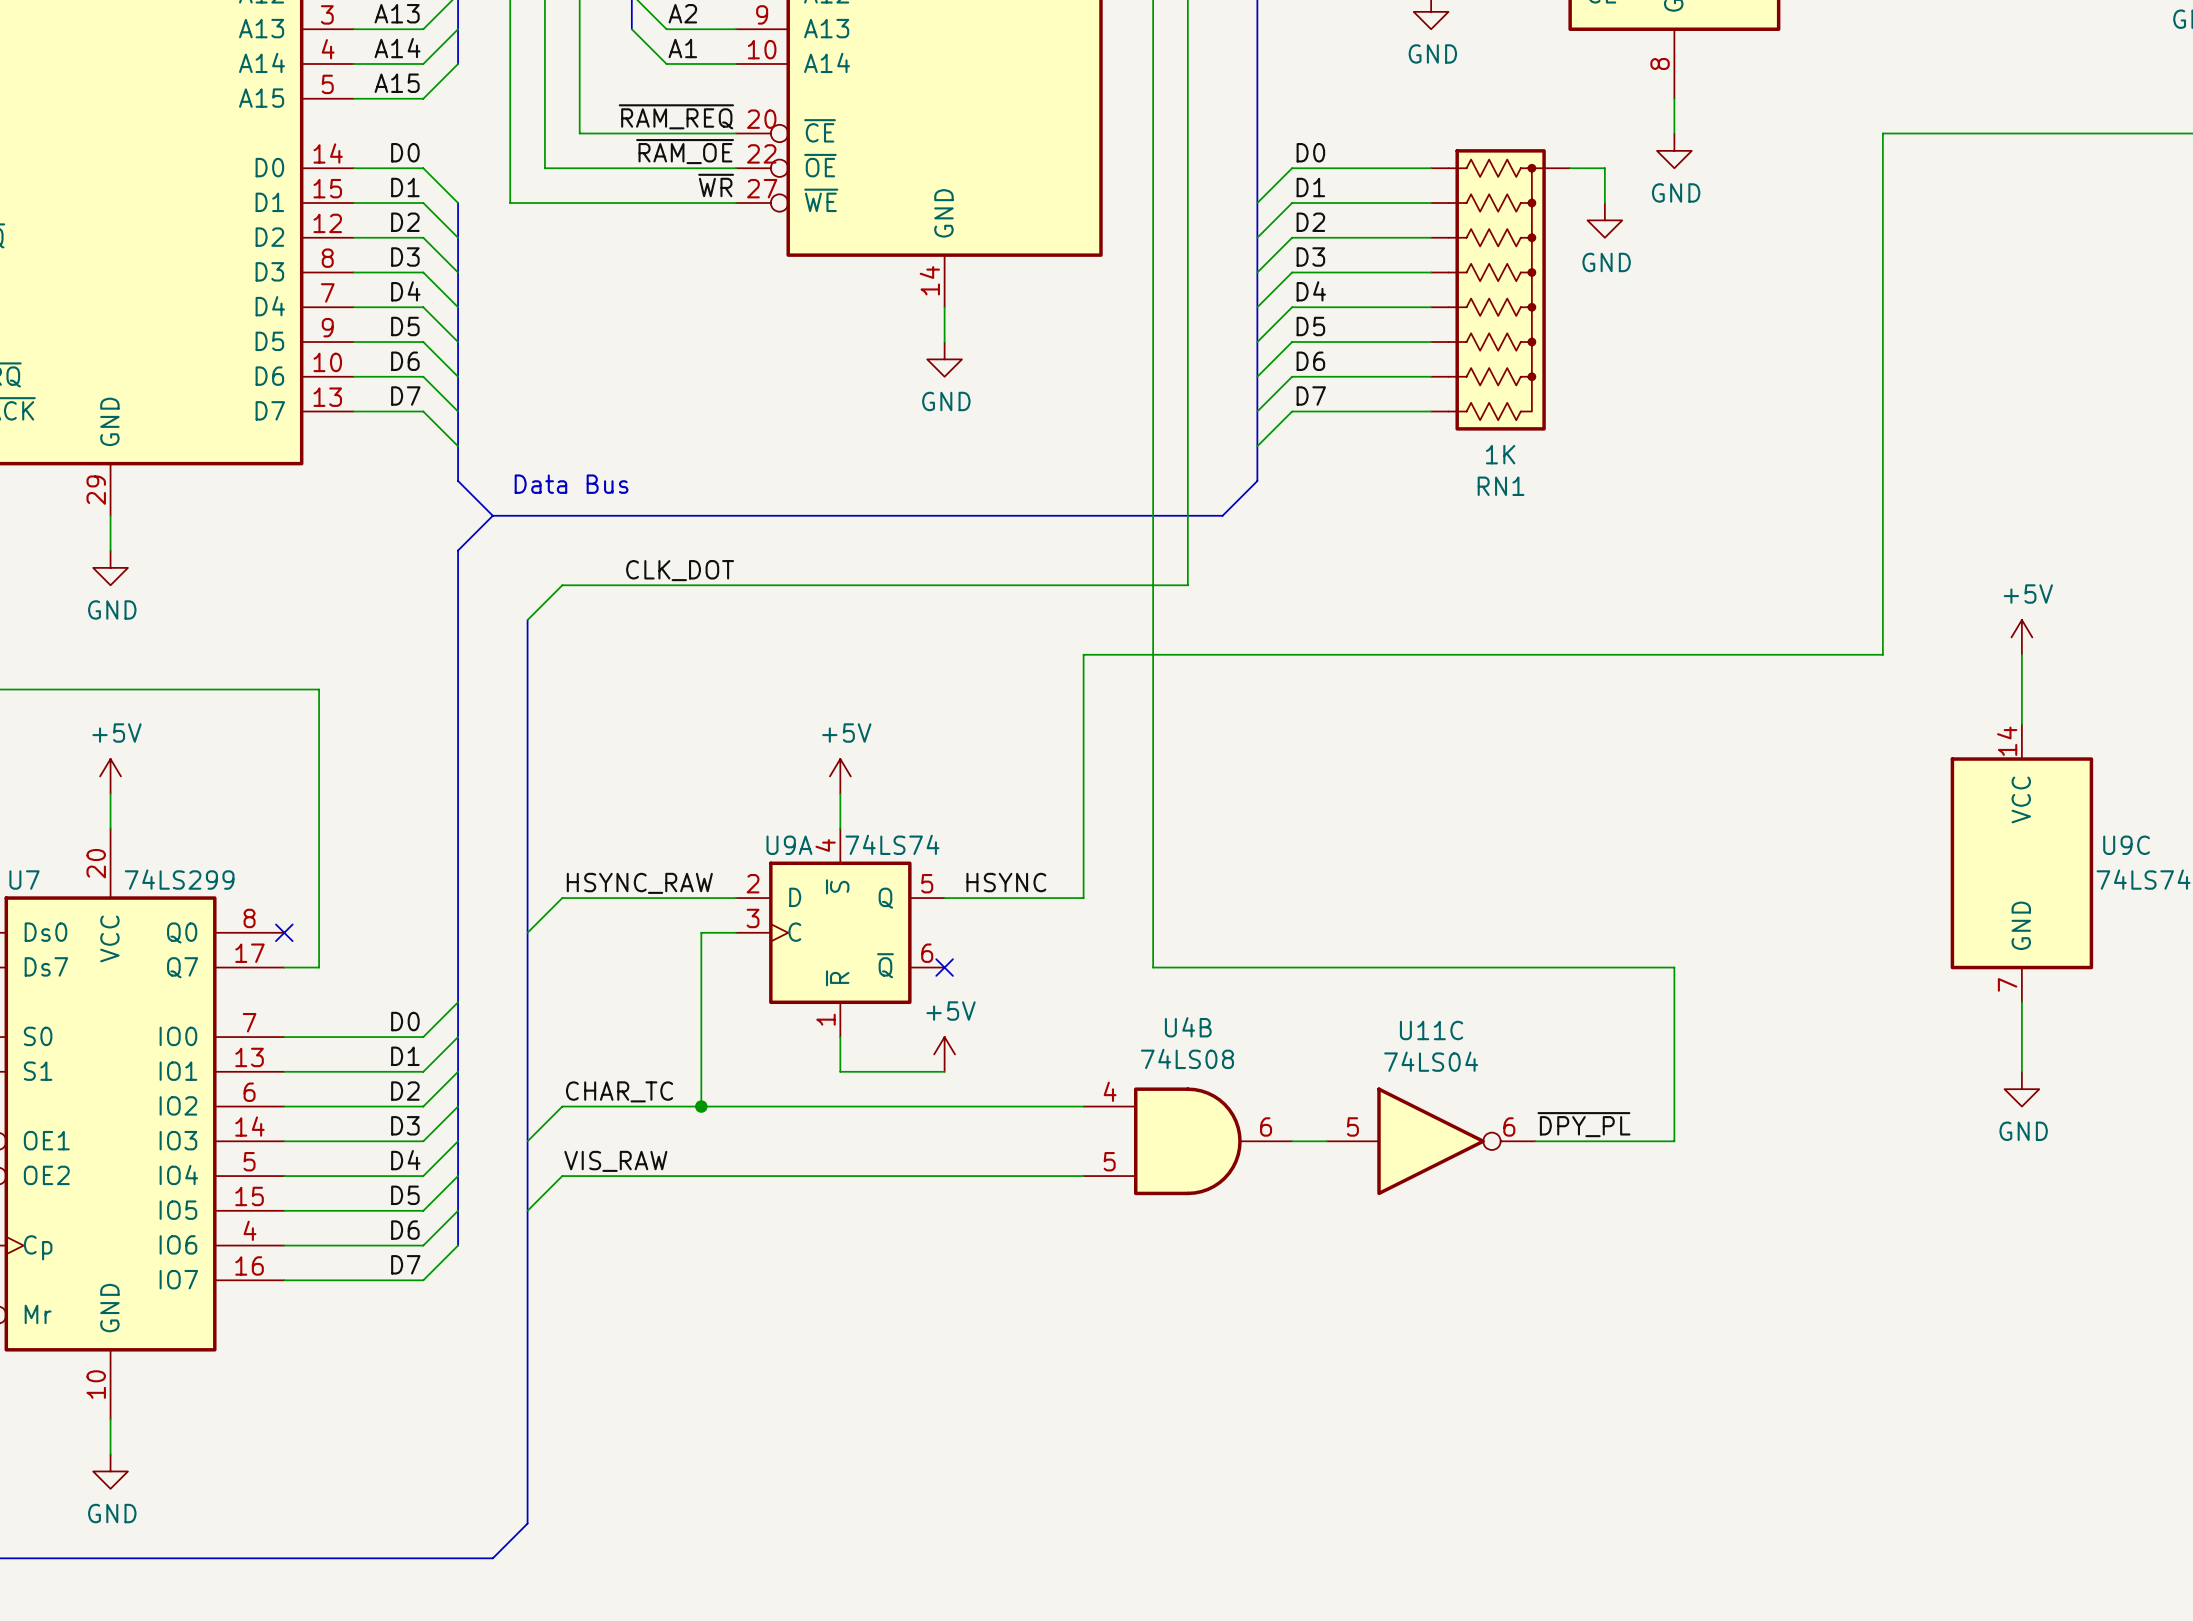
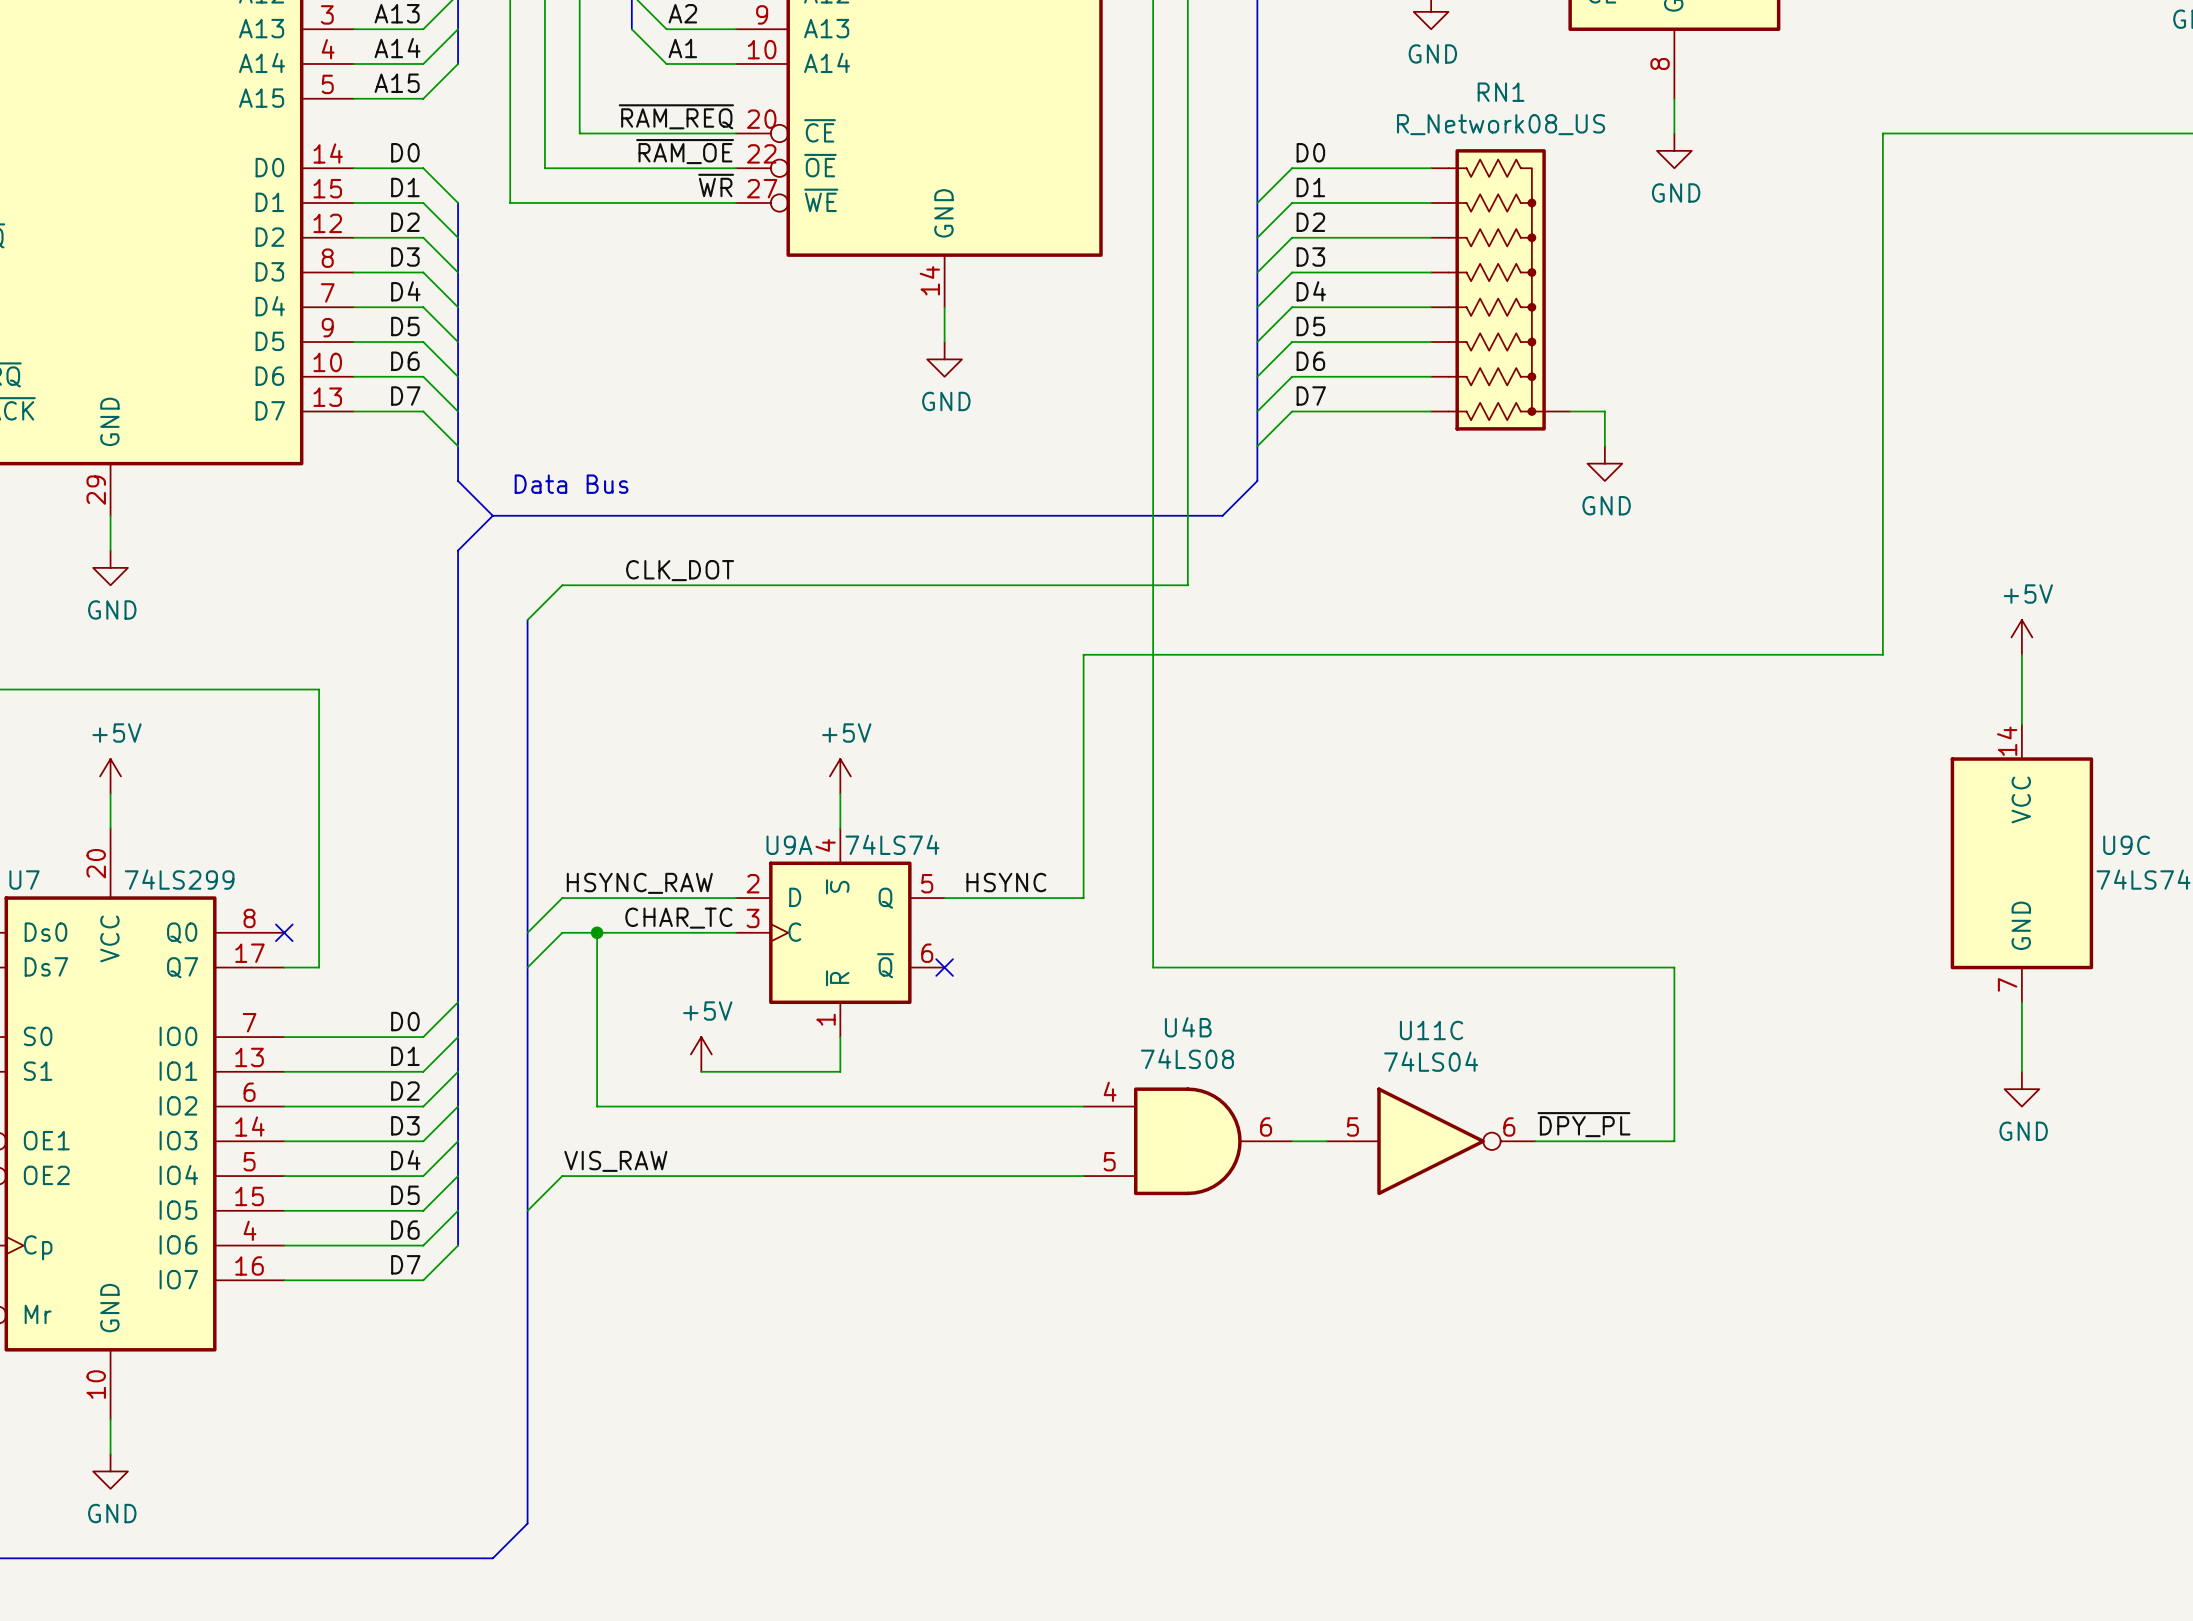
wire: (1570, 168) (1604, 168) (1604, 203) -> (1570, 411) (1604, 411) (1604, 446)
power symbol position: GND (1604, 220) -> GND (1604, 463)
RN1 flip: as is (1497, 289) -> up-down (1497, 289)
RN1 value: 1K (1500, 454) -> R_Network08_US (1501, 124)
junction: none -> (597, 932)
wire: (701, 932) (701, 1106) -> (701, 932) (562, 932) (527, 967)
power symbol position: +5V (944, 1054) -> +5V (701, 1054)
wire: (840, 1071) (944, 1071) -> (840, 1071) (701, 1071)
label position: CHAR_TC (619, 1091) -> CHAR_TC (678, 918)
wire: (597, 1106) (562, 1106) (527, 1141) -> (597, 1106) (597, 932)
junction: (701, 1106) -> none

